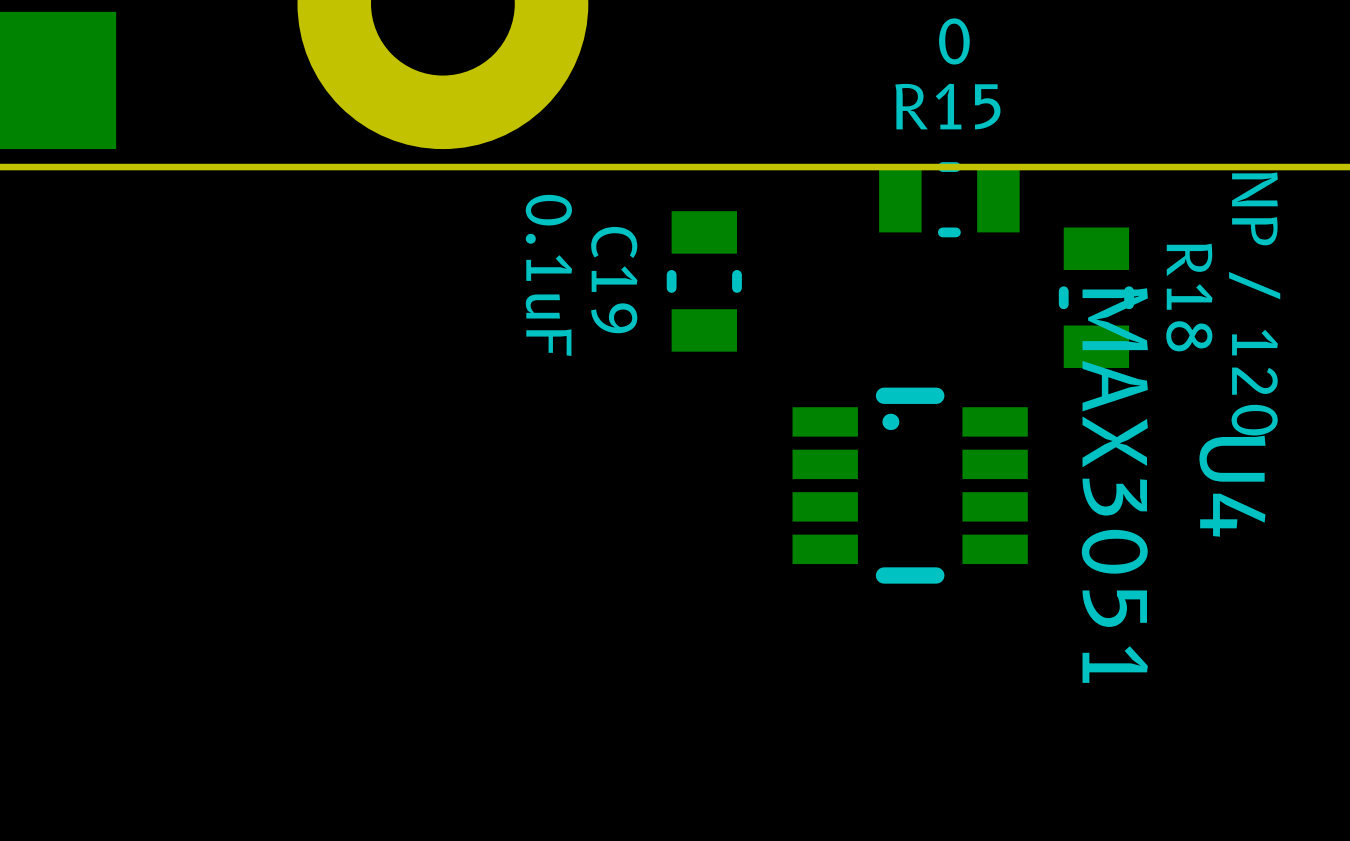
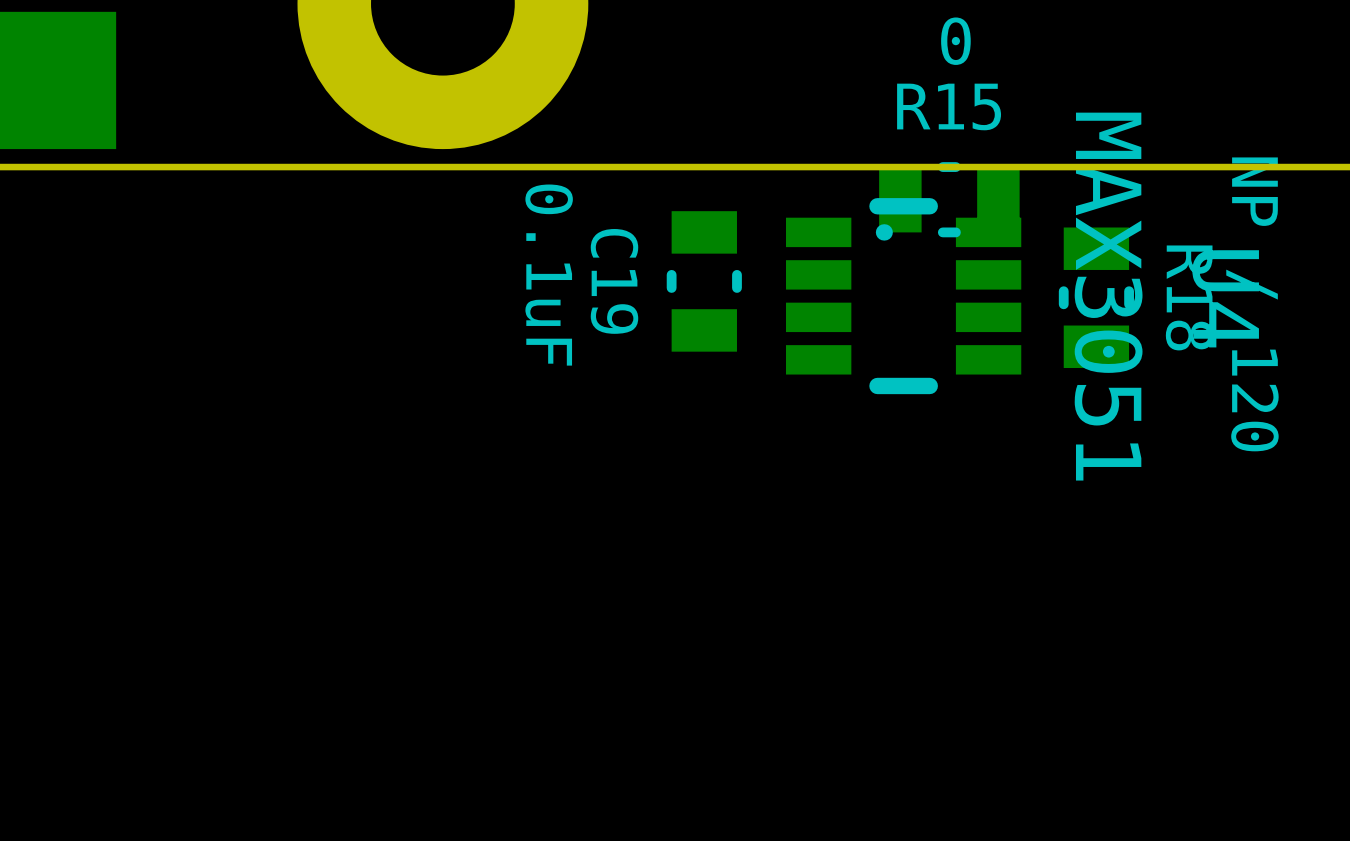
U4 position: (910, 485) -> (903, 296)

